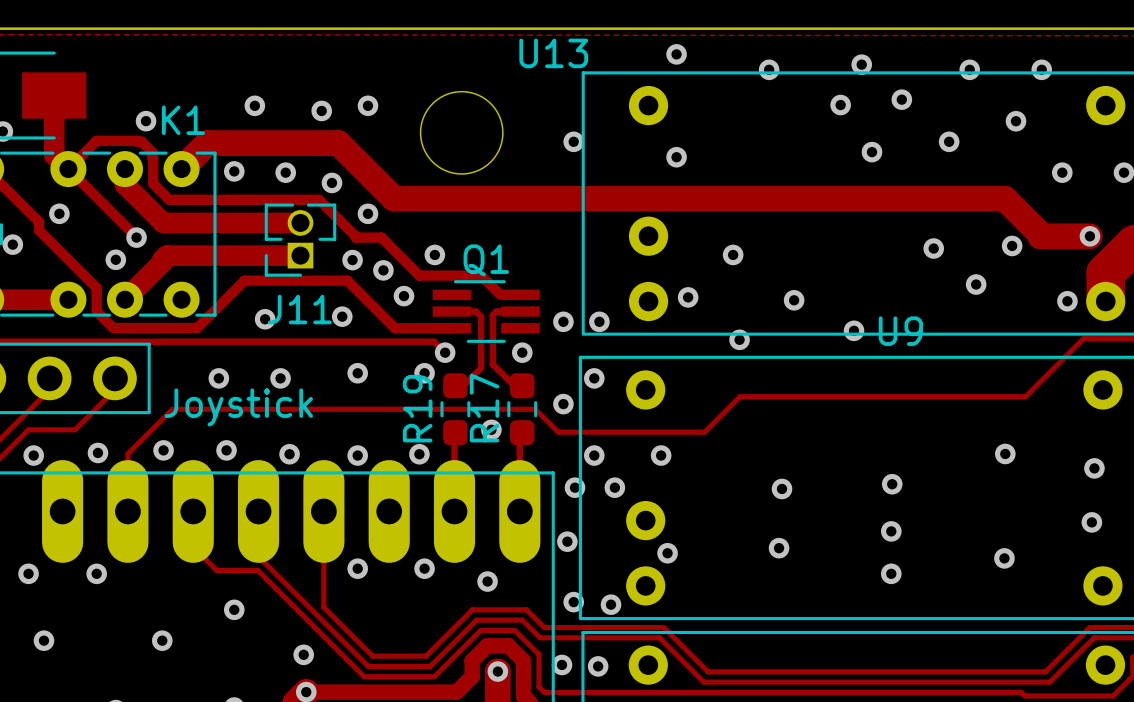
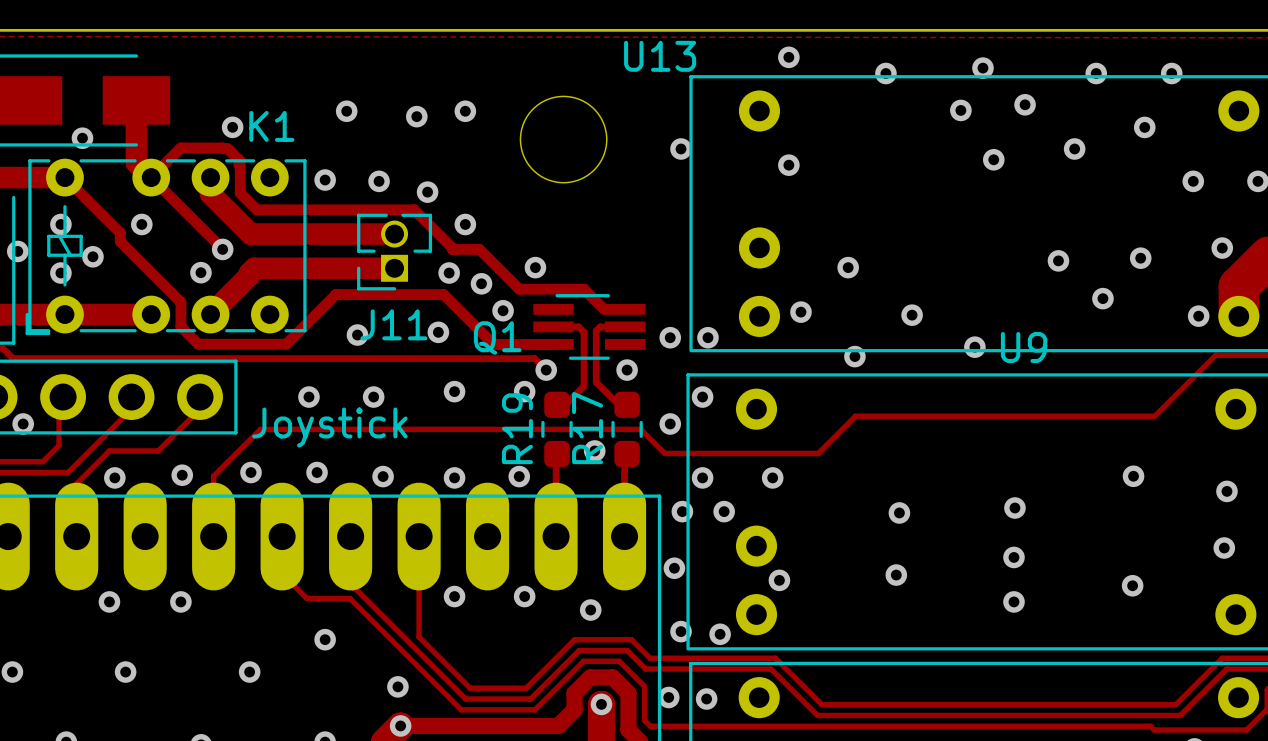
track: (181, 169) (207, 143) (338, 143) (393, 198) (1004, 198) (1040, 236) (1089, 236) -> none
Q1 name position: Q1 (486, 260) -> Q1 (497, 337)

